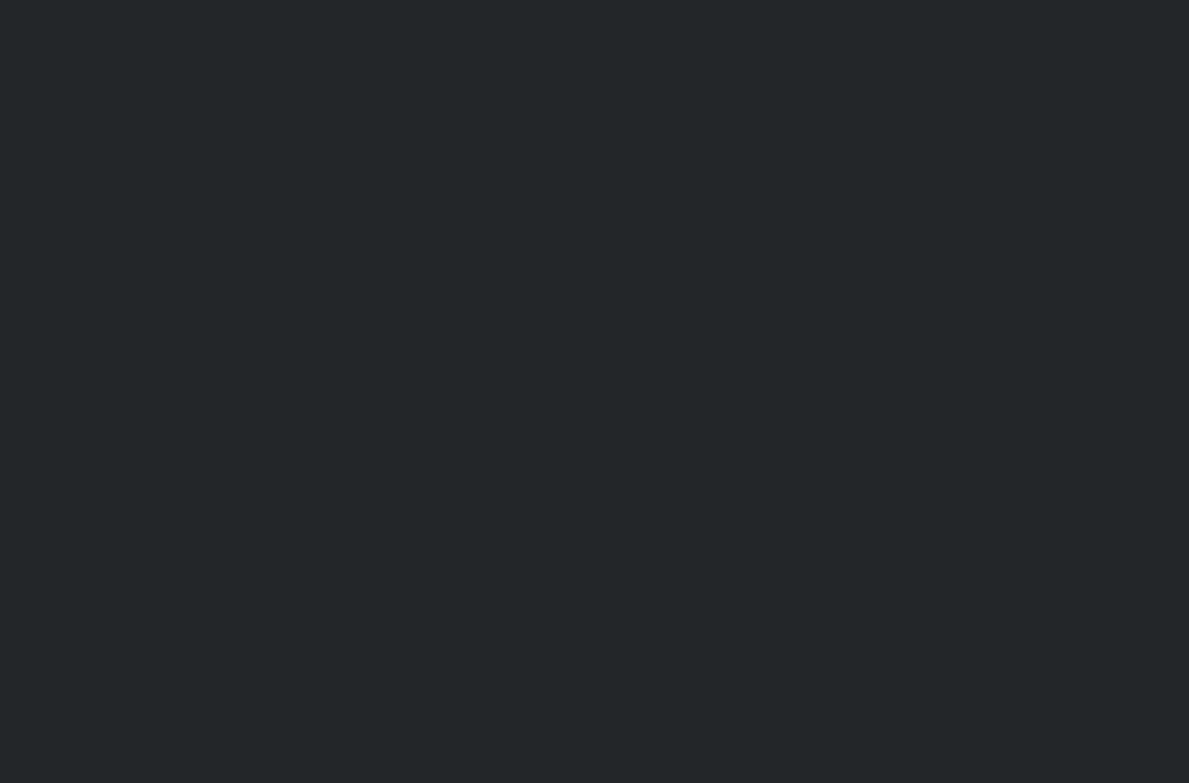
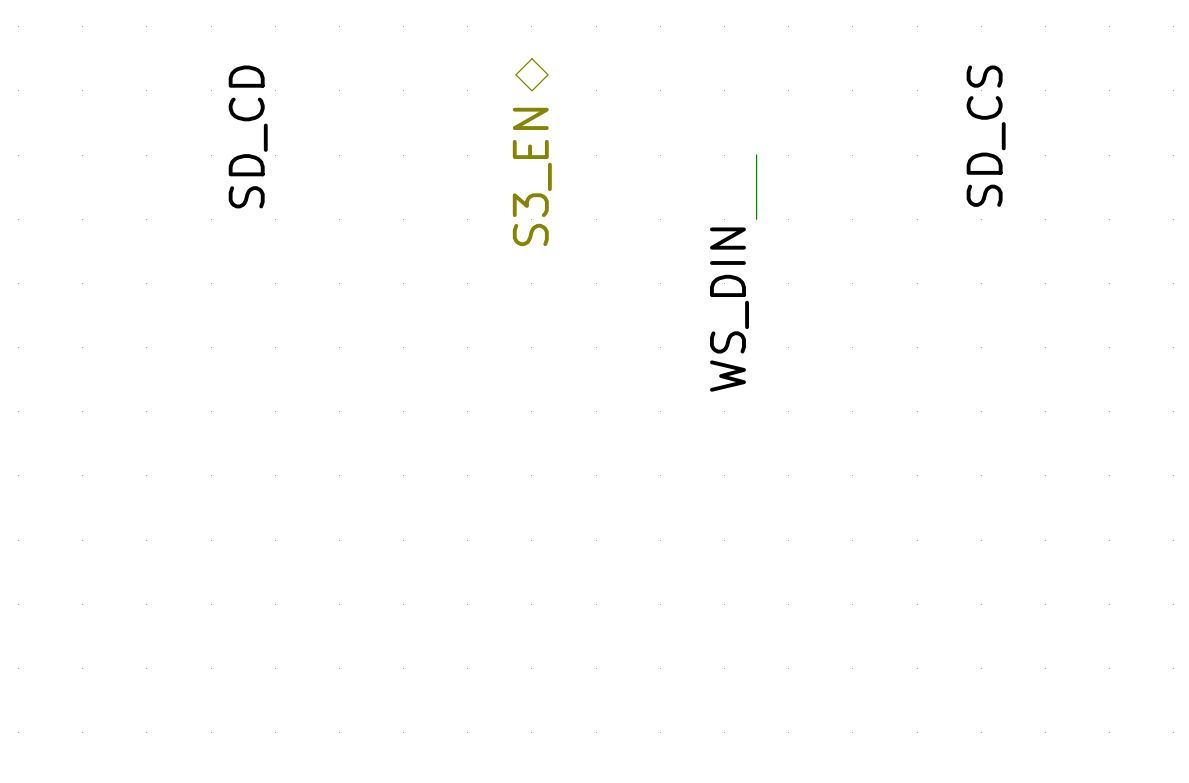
label: none -> SD_CD (248, 136)
label: none -> SD_CS (986, 136)
wire: none -> (756, 155) (756, 219)
hierarchical label: none -> S3_EN (532, 176)
label: none -> WS_DIN (729, 309)

